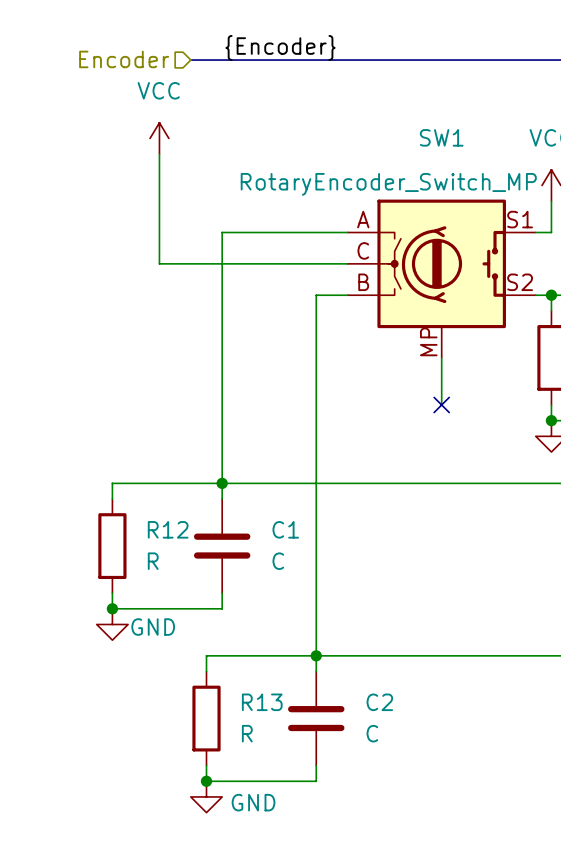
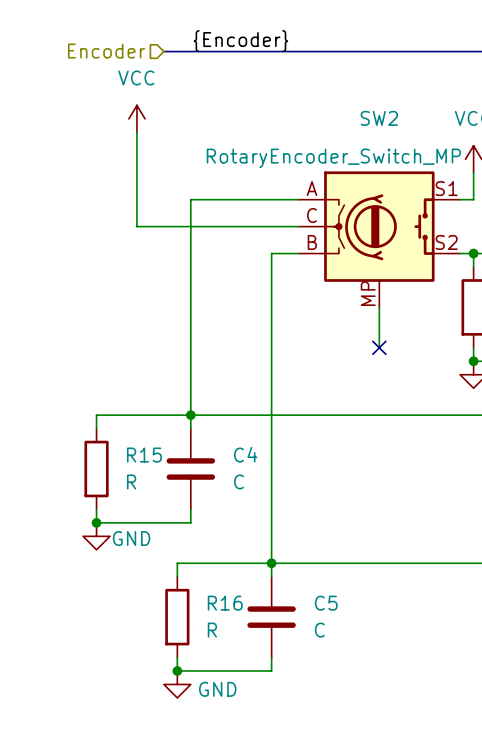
SW1 name: SW1 (441, 137) -> SW2 (379, 118)
R12 name: R12 (168, 529) -> R15 (144, 455)
C1 name: C1 (285, 529) -> C4 (245, 454)
R13 name: R13 (262, 702) -> R16 (225, 603)
C2 name: C2 (379, 702) -> C5 (326, 603)

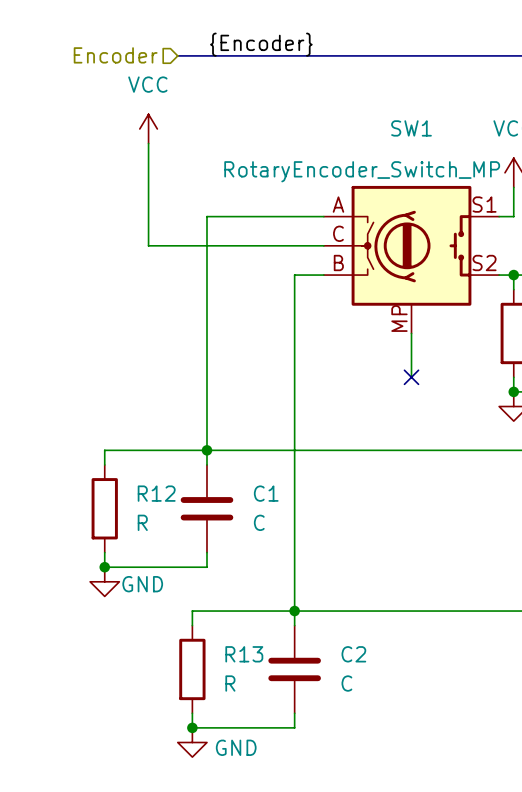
SW2 name: SW2 (379, 118) -> SW1 (411, 128)
C4 name: C4 (245, 454) -> C1 (266, 493)
R15 name: R15 (144, 455) -> R12 (156, 493)
R16 name: R16 (225, 603) -> R13 (244, 654)
C5 name: C5 (326, 603) -> C2 (353, 654)

